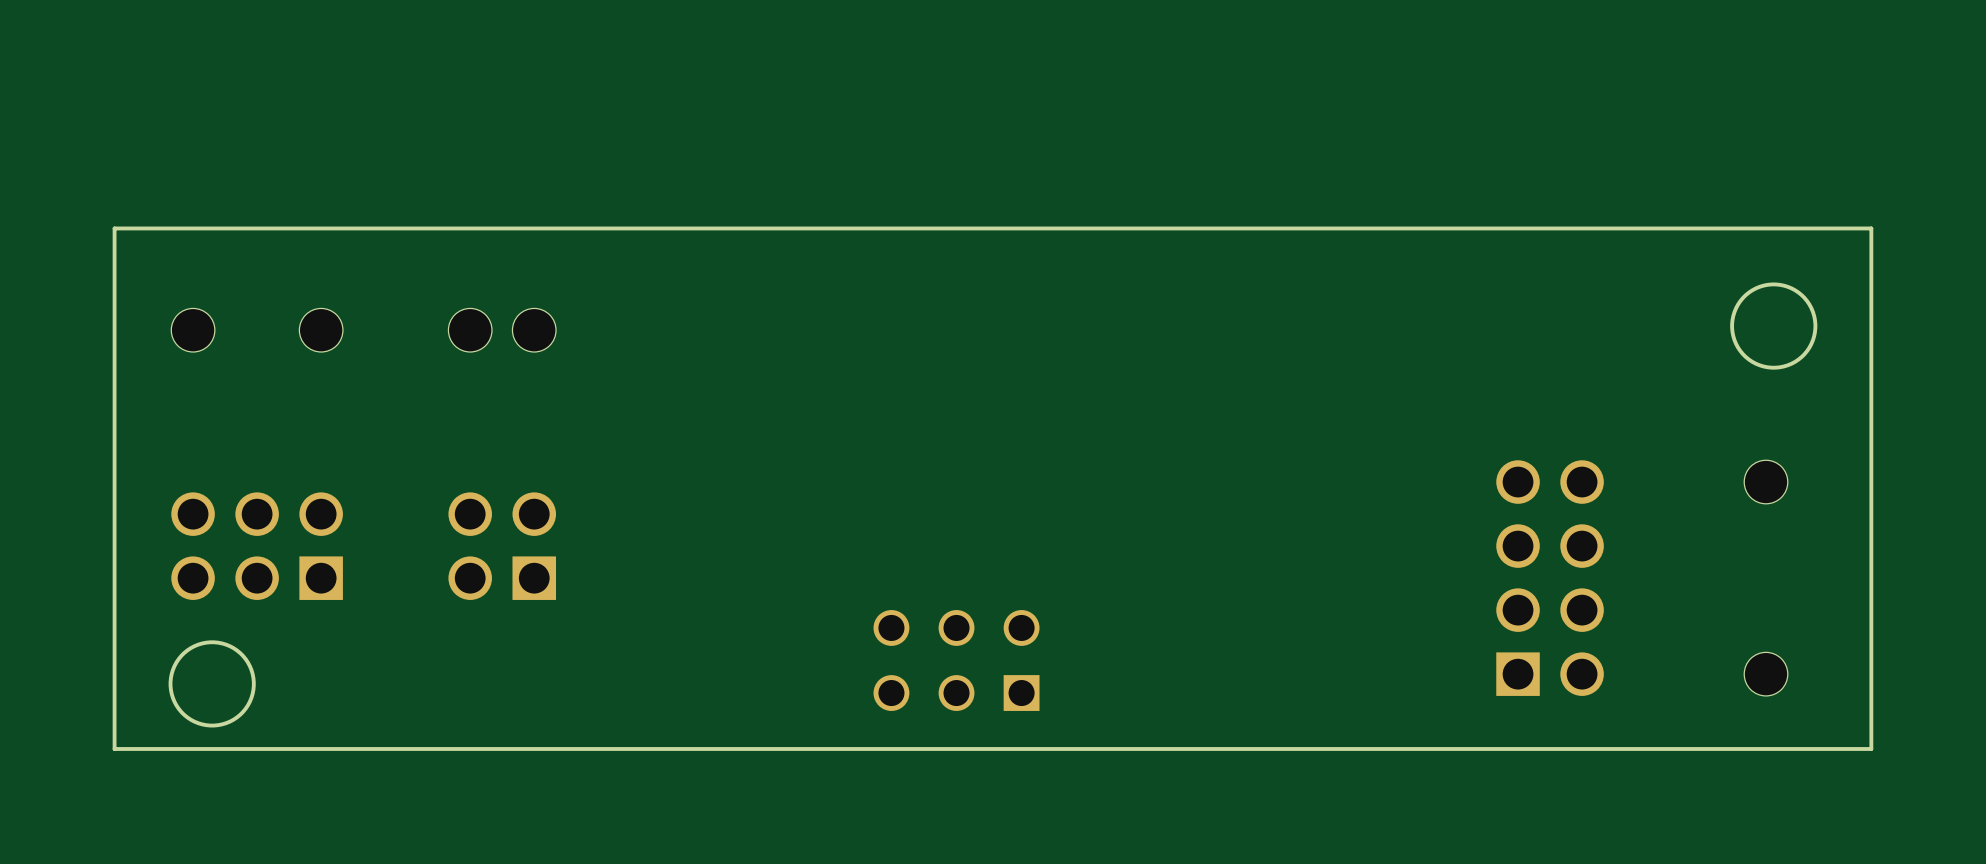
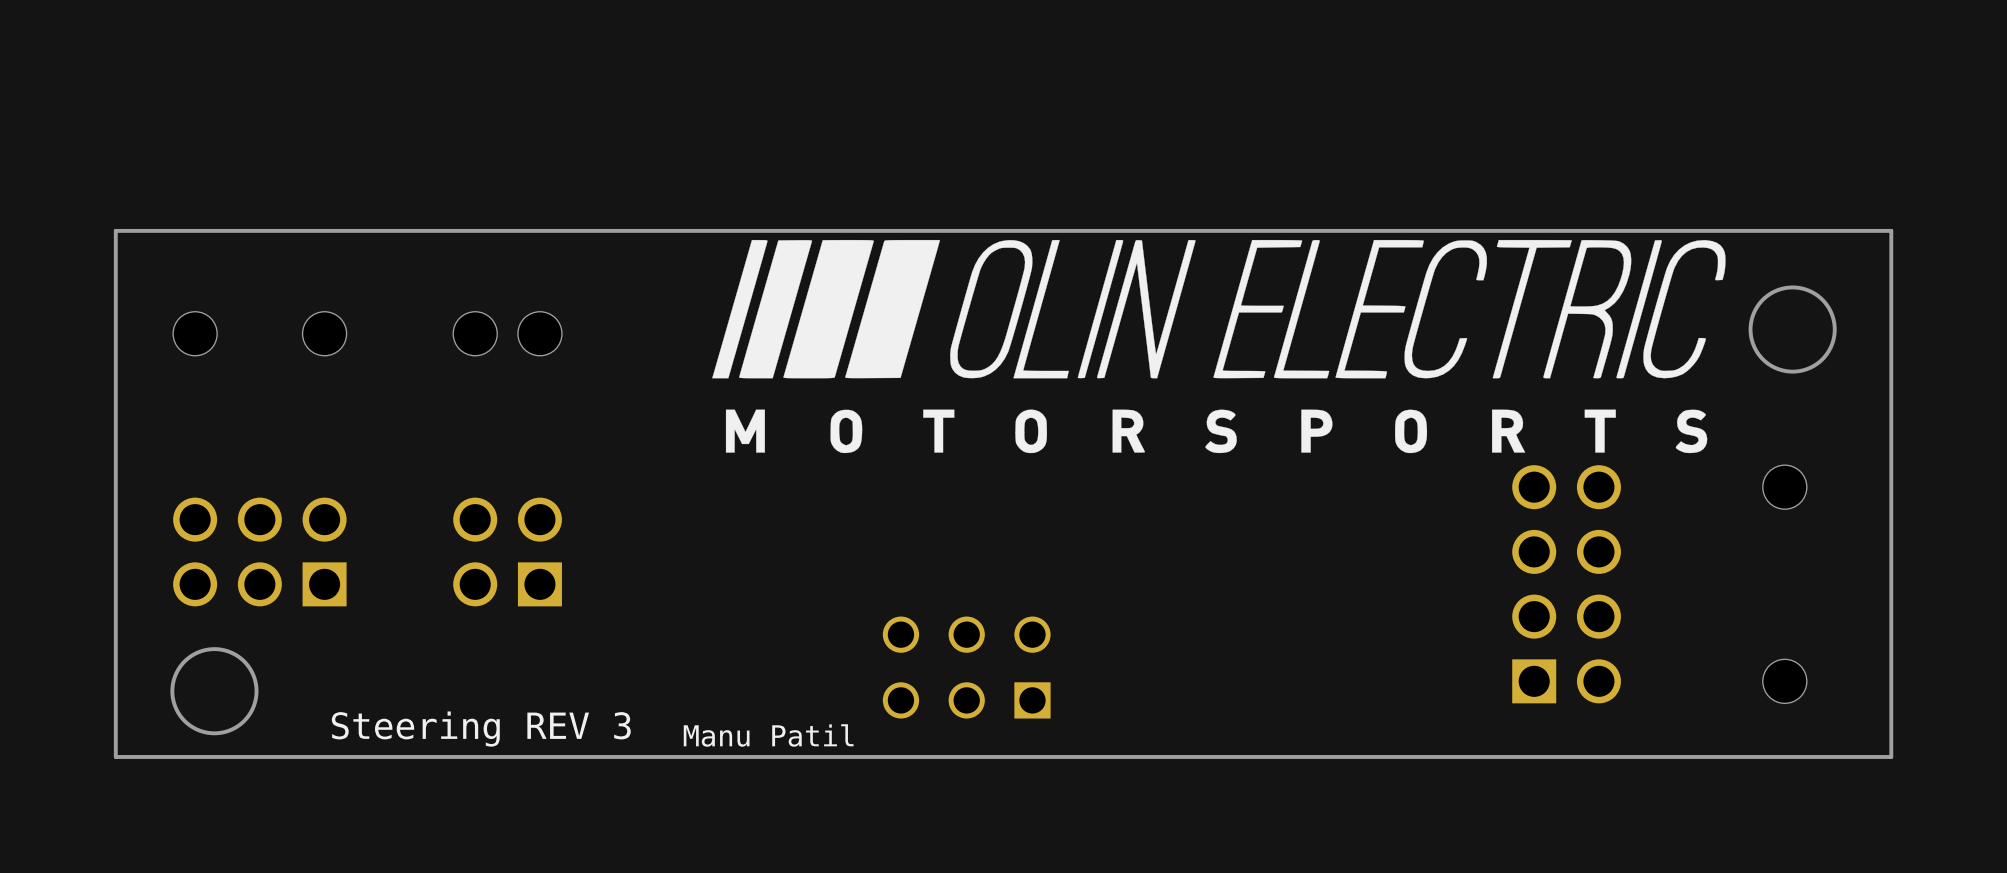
drawing: none -> [712, 239, 1726, 454]
text: none -> Steering REV 3 (481, 729)
text: none -> Manu Patil (768, 735)

